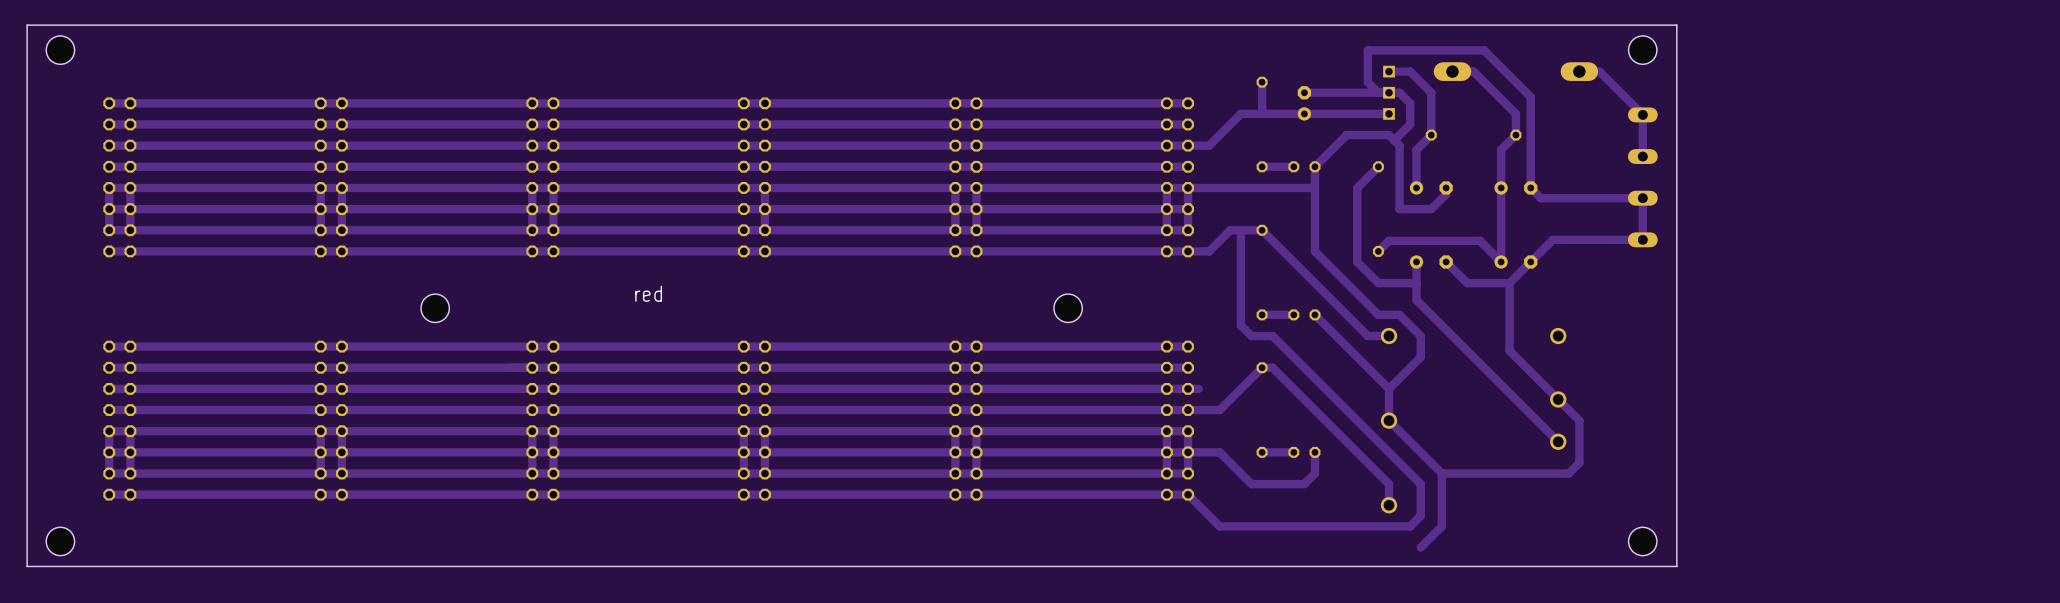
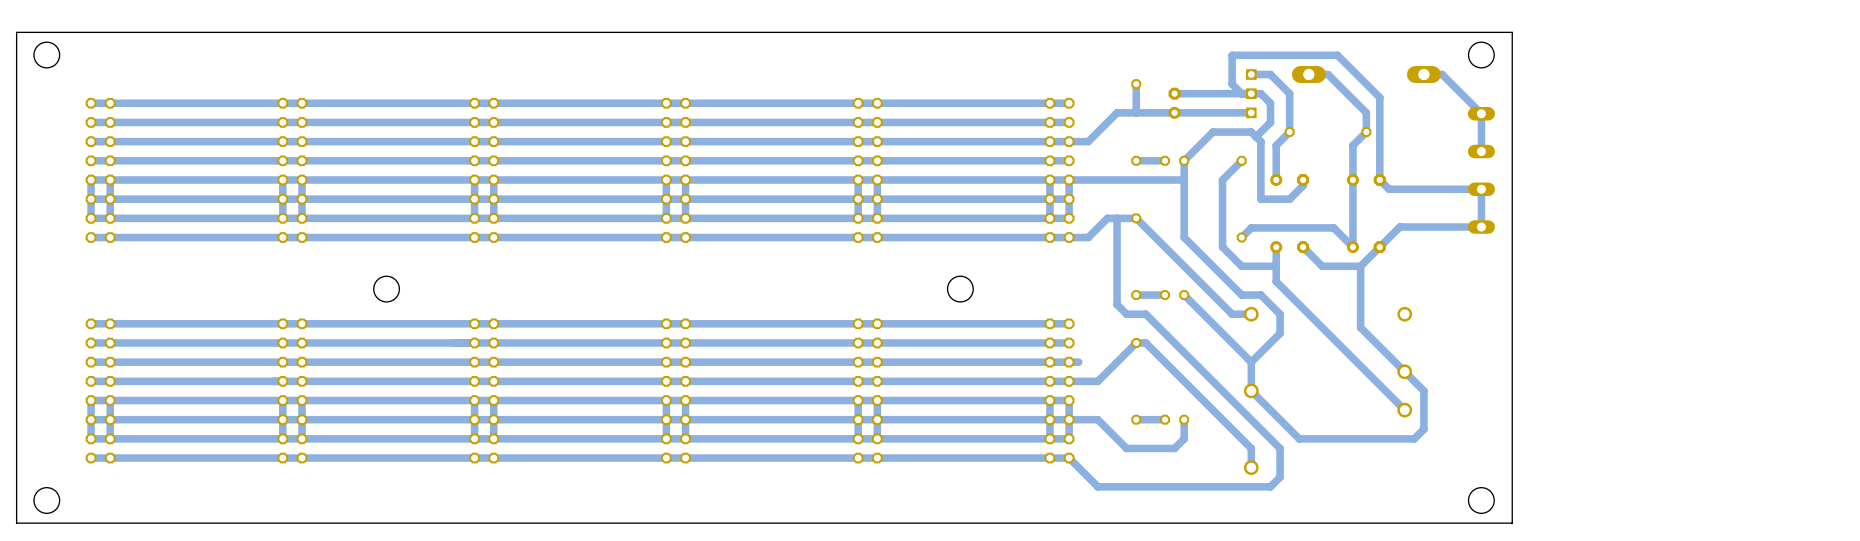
track: none -> (666, 179) (666, 218)
text: red (648, 293) -> none
track: (1441, 473) (1441, 526) (1420, 547) -> none

